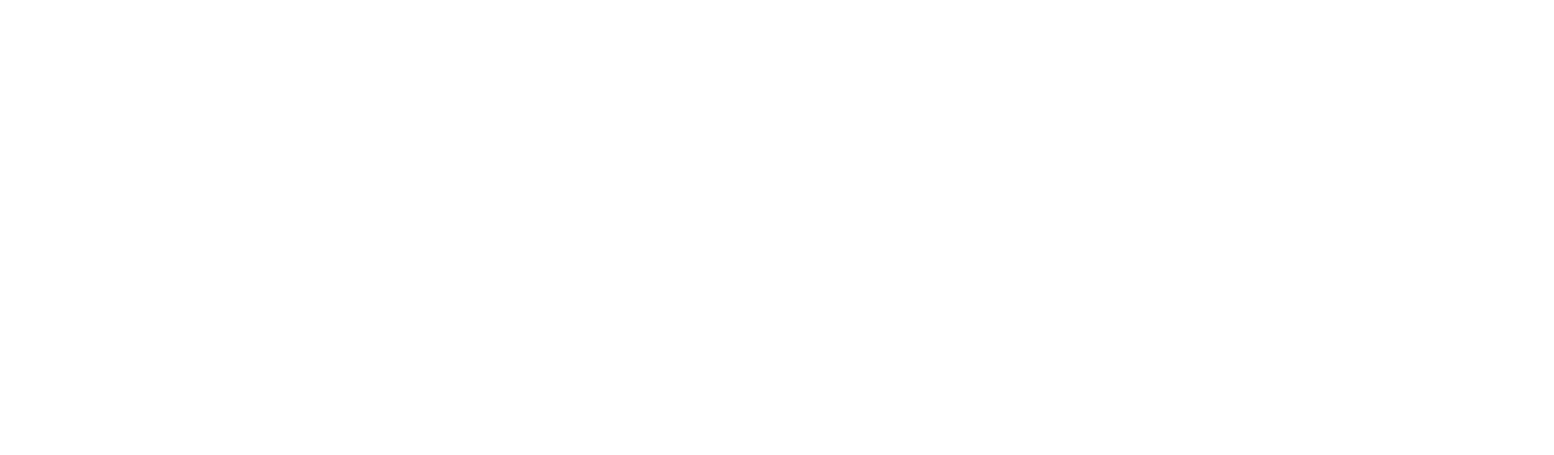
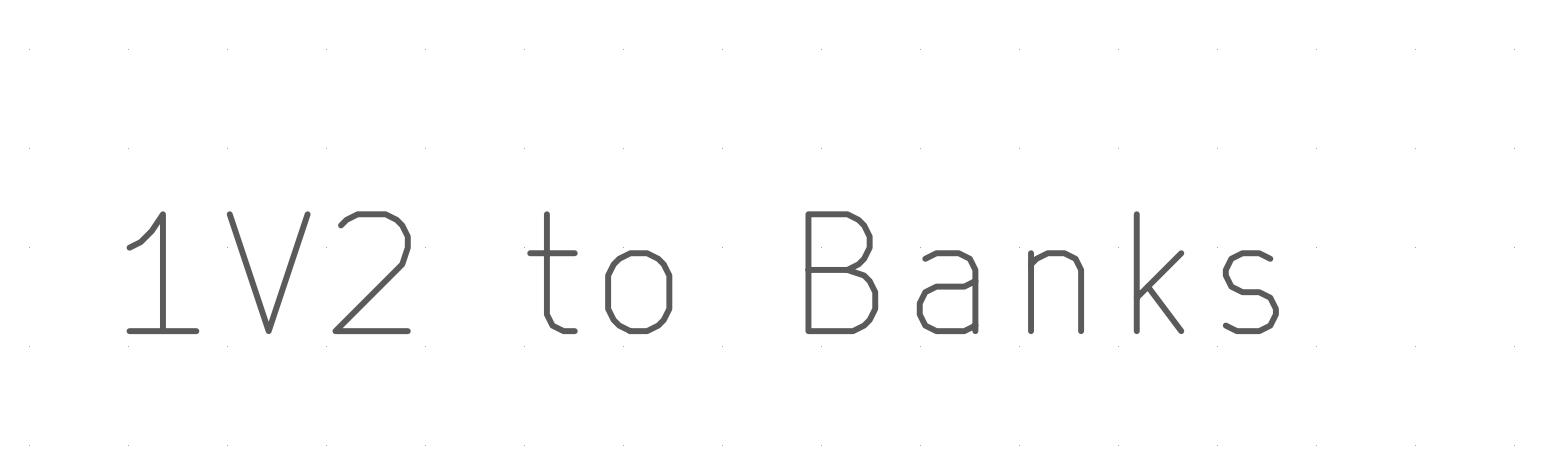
text: none -> 1V2 to Banks (702, 272)

